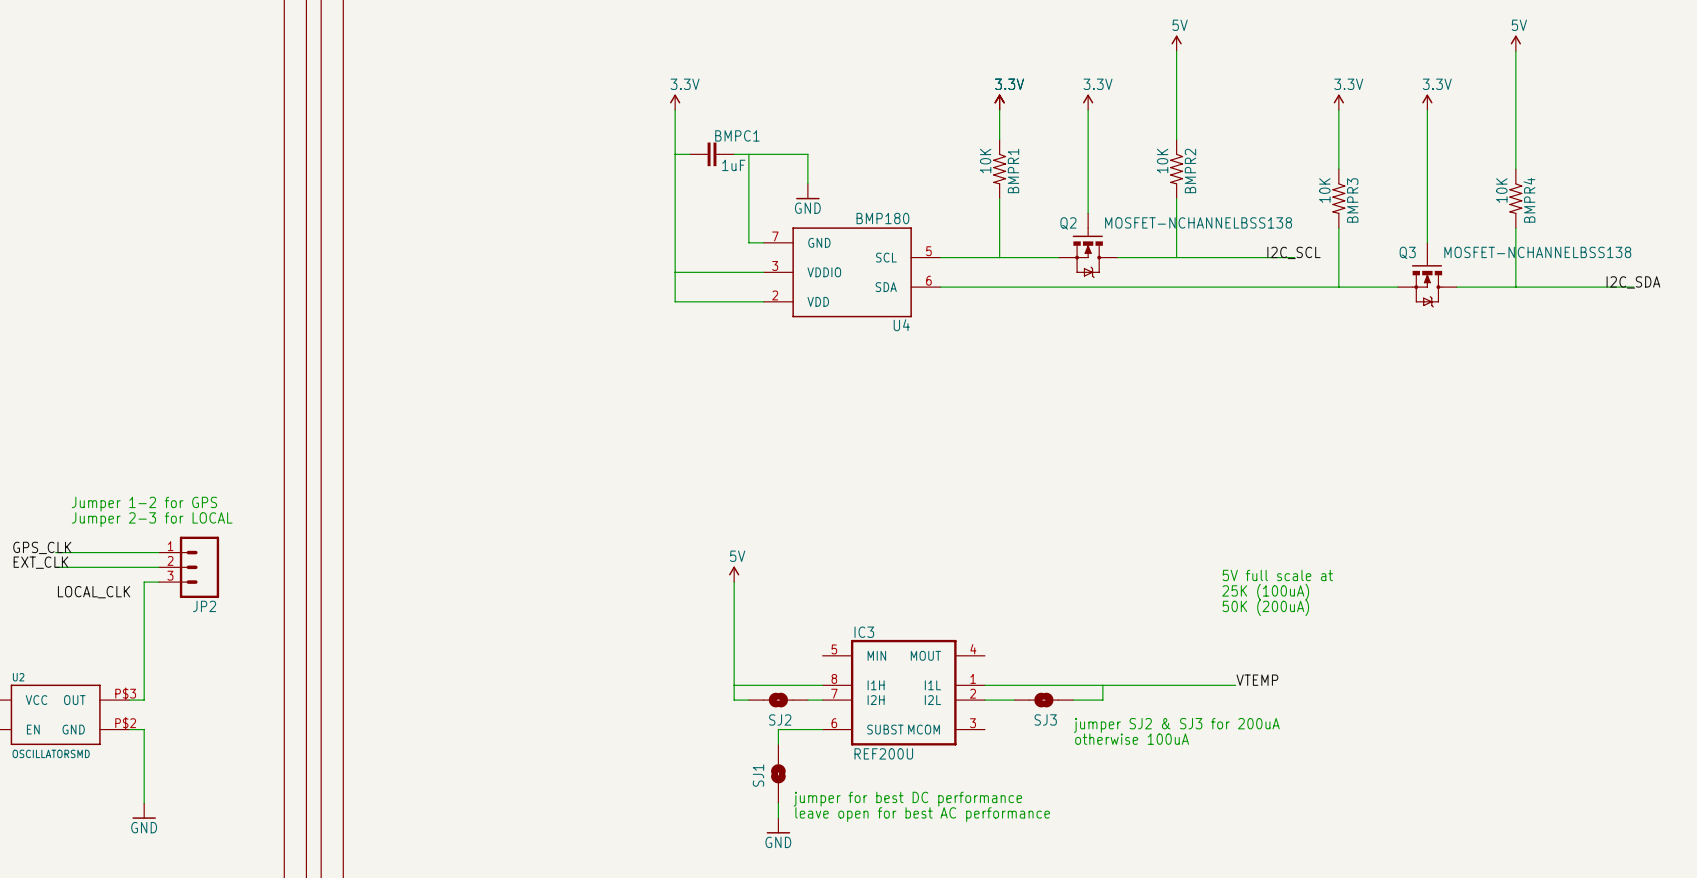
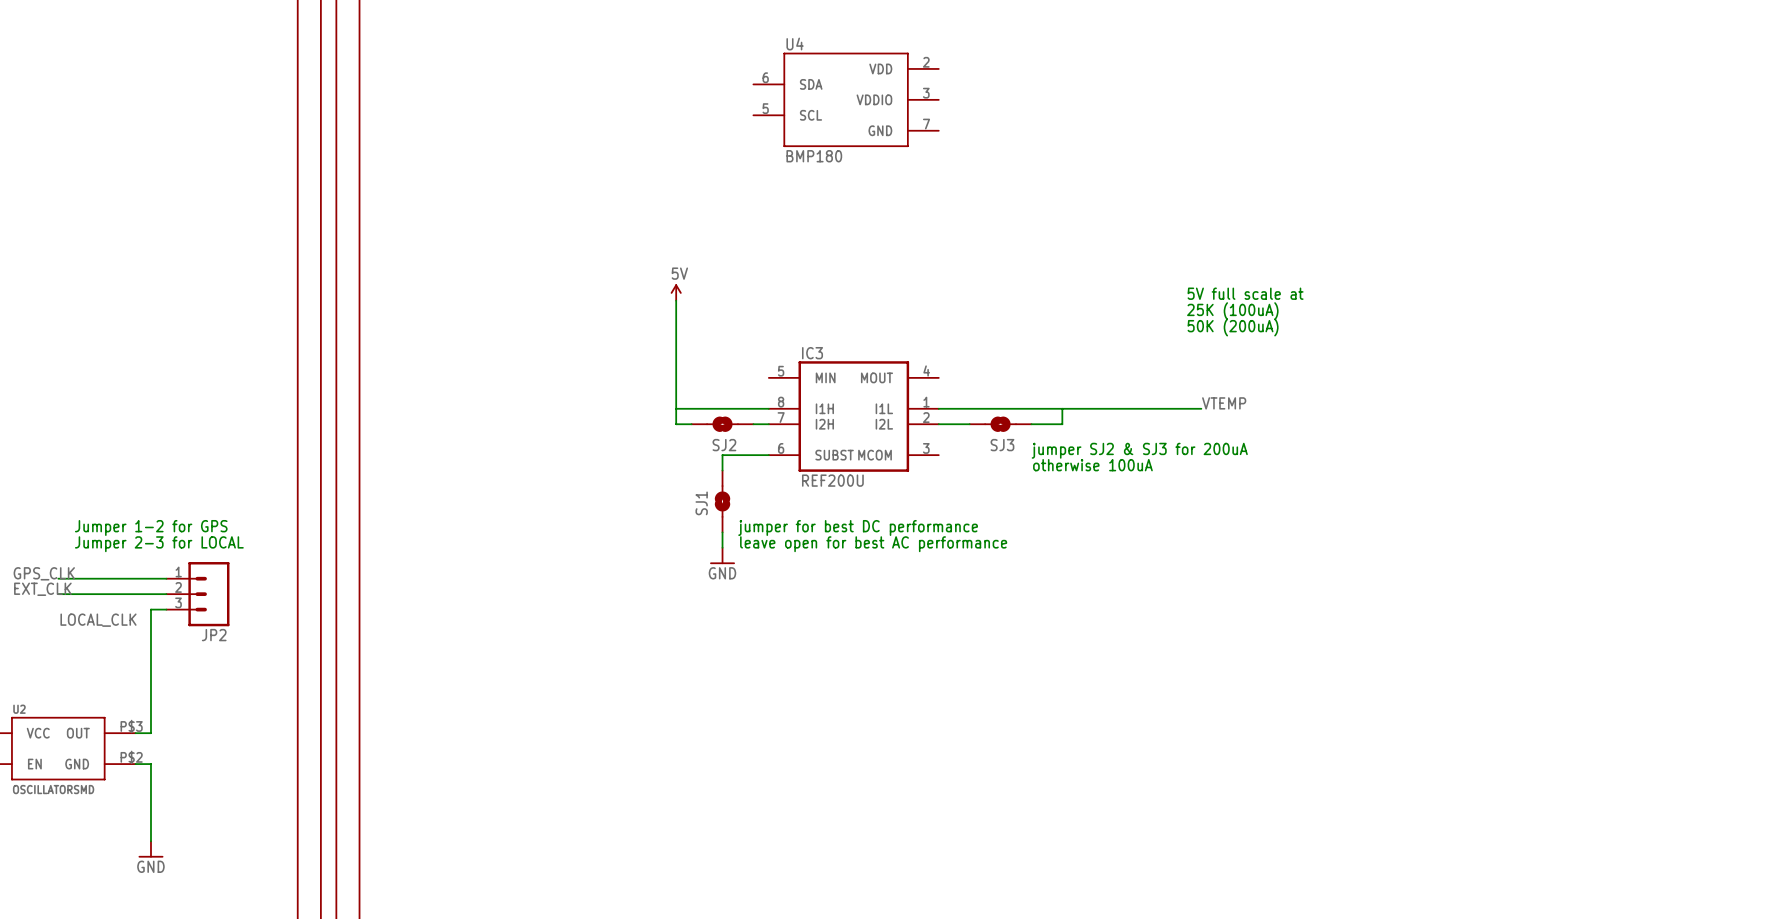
power symbol: 5V (1176, 43) -> none
power symbol: 5V (1515, 43) -> none
wire: (1176, 51) (1176, 139) -> none
wire: (1515, 51) (1515, 169) -> none
power symbol: 3.3V (675, 102) -> none
power symbol: 3.3V (999, 102) -> none
power symbol: 3.3V (1088, 102) -> none
power symbol: 3.3V (1338, 102) -> none
power symbol: 3.3V (1427, 102) -> none
wire: (675, 110) (675, 301) (763, 301) -> none
wire: (999, 110) (999, 139) -> none
wire: (1088, 110) (1088, 213) -> none
wire: (1338, 110) (1338, 169) -> none
wire: (1427, 110) (1427, 242) -> none
wire: (675, 154) (689, 154) -> none
BMPC1: 1uF (712, 154) -> none
wire: (734, 154) (807, 154) (807, 183) -> none
wire: (748, 154) (748, 242) (763, 242) -> none
BMPR1: 10K (999, 169) -> none
BMPR2: 10K (1176, 169) -> none
power symbol: GND (807, 191) -> none
wire: (999, 198) (999, 257) -> none
wire: (1176, 198) (1176, 257) -> none
BMPR3: 10K (1338, 198) -> none
BMPR4: 10K (1515, 198) -> none
wire: (1338, 228) (1338, 287) -> none
wire: (1515, 228) (1515, 287) -> none
Q2: MOSFET-NCHANNELBSS138 (1088, 245) -> none
label: I2C_SCL (1293, 252) -> none
wire: (940, 257) (1058, 257) -> none
wire: (1117, 257) (1294, 257) -> none
wire: (675, 272) (763, 272) -> (676, 408) (768, 408)
U4 rotation: 0° (852, 272) -> 180° (846, 99)
U4 position: (852, 272) -> (846, 99)
Q3: MOSFET-NCHANNELBSS138 (1427, 275) -> none
power symbol: none -> 5V (676, 292)
text: none -> 5V full scale at (1245, 293)
label: I2C_SDA (1633, 282) -> none
wire: none -> (676, 300) (676, 424) (691, 424)
wire: (940, 287) (1397, 287) -> none
wire: (1456, 287) (1633, 287) -> none
text: none -> 25K (100uA) (1232, 311)
text: none -> 50K (200uA) (1233, 327)
label: none -> VTEMP (1224, 403)
wire: none -> (938, 408) (1201, 408)
wire: none -> (1062, 408) (1062, 424) (1031, 424)
wire: none -> (753, 424) (768, 424)
wire: none -> (938, 424) (969, 424)
text: none -> jumper SJ2 & SJ3 for 200uA (1139, 450)
wire: none -> (768, 455) (722, 455) (722, 470)
text: none -> otherwise 100uA (1092, 465)
text: none -> jumper for best DC performance (858, 527)
wire: none -> (722, 532) (722, 547)
text: none -> leave open for best AC performance (873, 544)
power symbol: none -> GND (722, 555)
power symbol: 5V (734, 574) -> none
text: 5V full scale at (1277, 575) -> none
wire: (734, 582) (734, 700) (748, 700) -> none
text: 25K (100uA) (1265, 592) -> none
text: 50K (200uA) (1265, 607) -> none
label: VTEMP (1257, 680) -> none
wire: (734, 685) (822, 685) -> none
wire: (984, 685) (1235, 685) -> none
wire: (1102, 685) (1102, 700) (1073, 700) -> none
IC3 position: (903, 692) -> (853, 416)
SJ2 position: (778, 700) -> (722, 424)
wire: (807, 700) (822, 700) -> none
wire: (984, 700) (1014, 700) -> none
SJ3 position: (1043, 700) -> (1000, 424)
text: jumper SJ2 & SJ3 for 200uA (1176, 725) -> none
wire: (822, 729) (778, 729) (778, 744) -> none
text: otherwise 100uA (1132, 739) -> none
SJ1 position: (778, 773) -> (722, 501)
text: jumper for best DC performance (907, 799) -> none
wire: (778, 803) (778, 818) -> none
text: leave open for best AC performance (922, 814) -> none
power symbol: GND (778, 825) -> none

